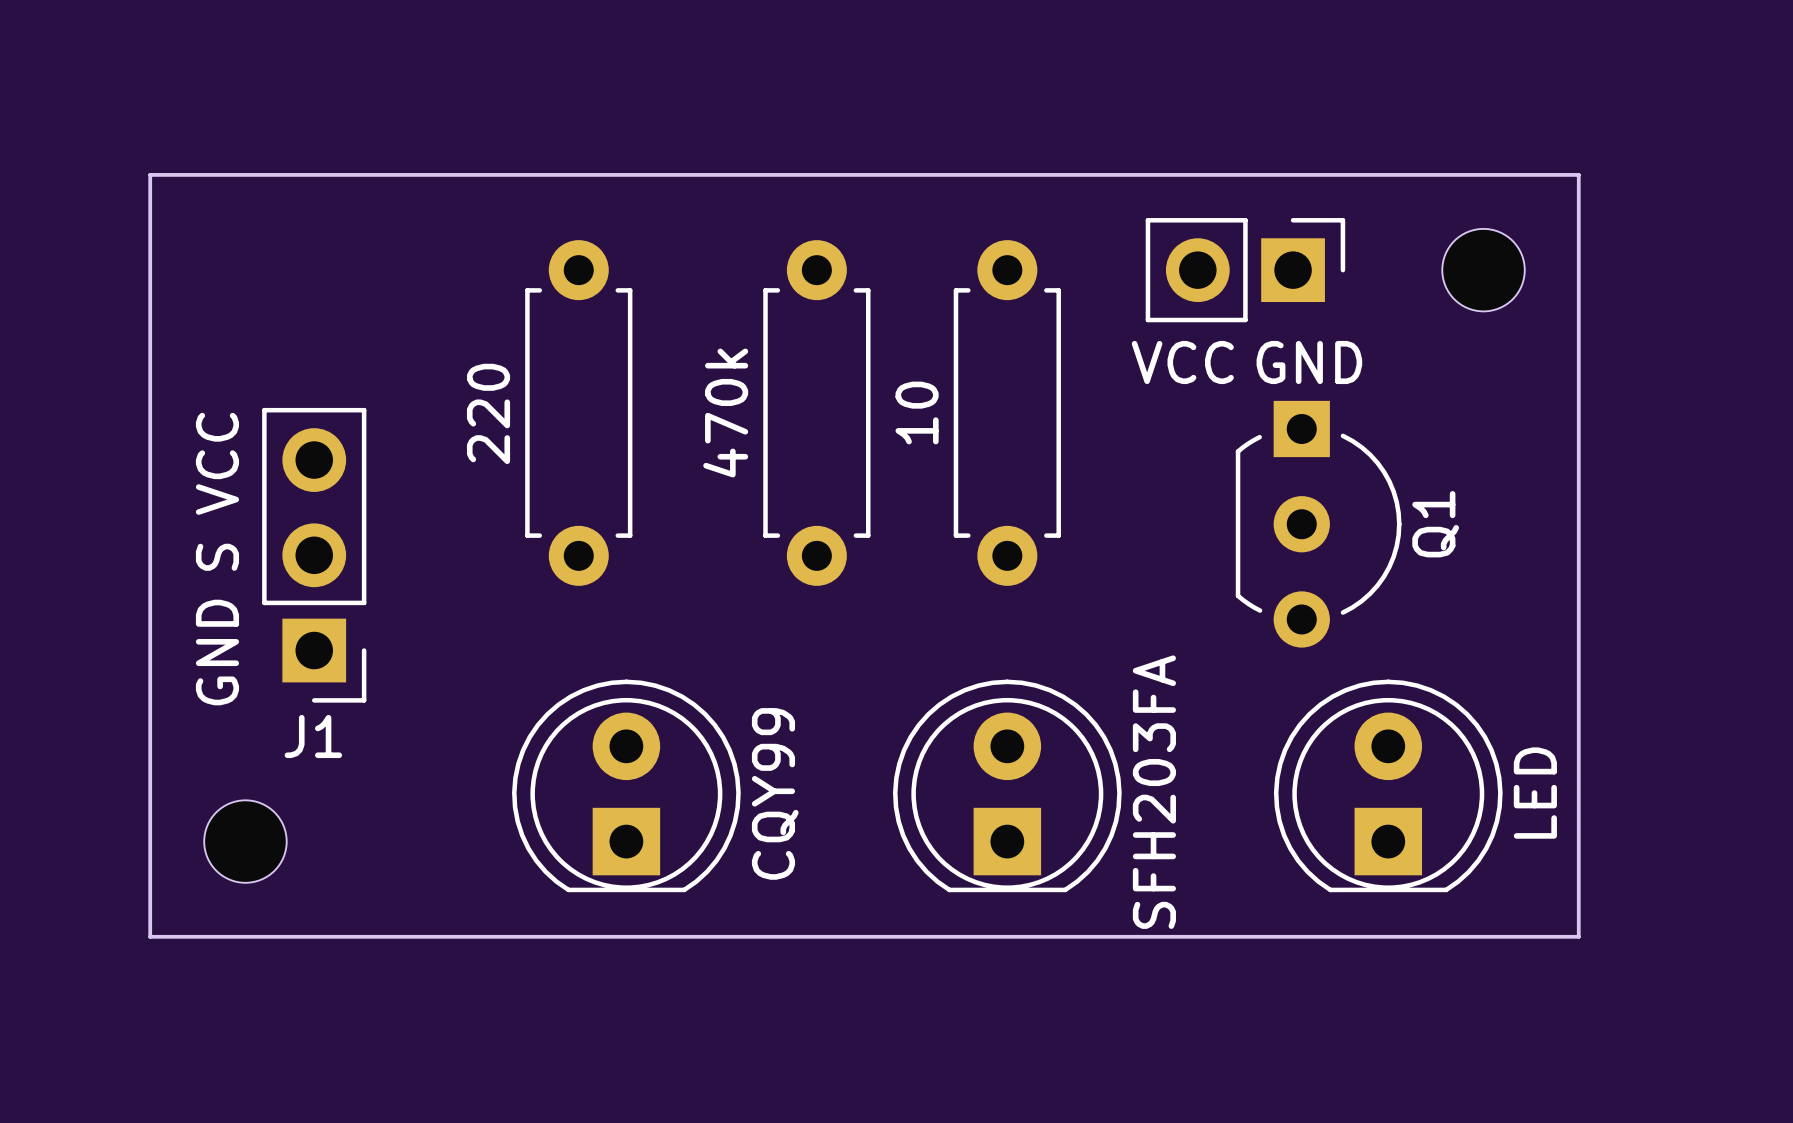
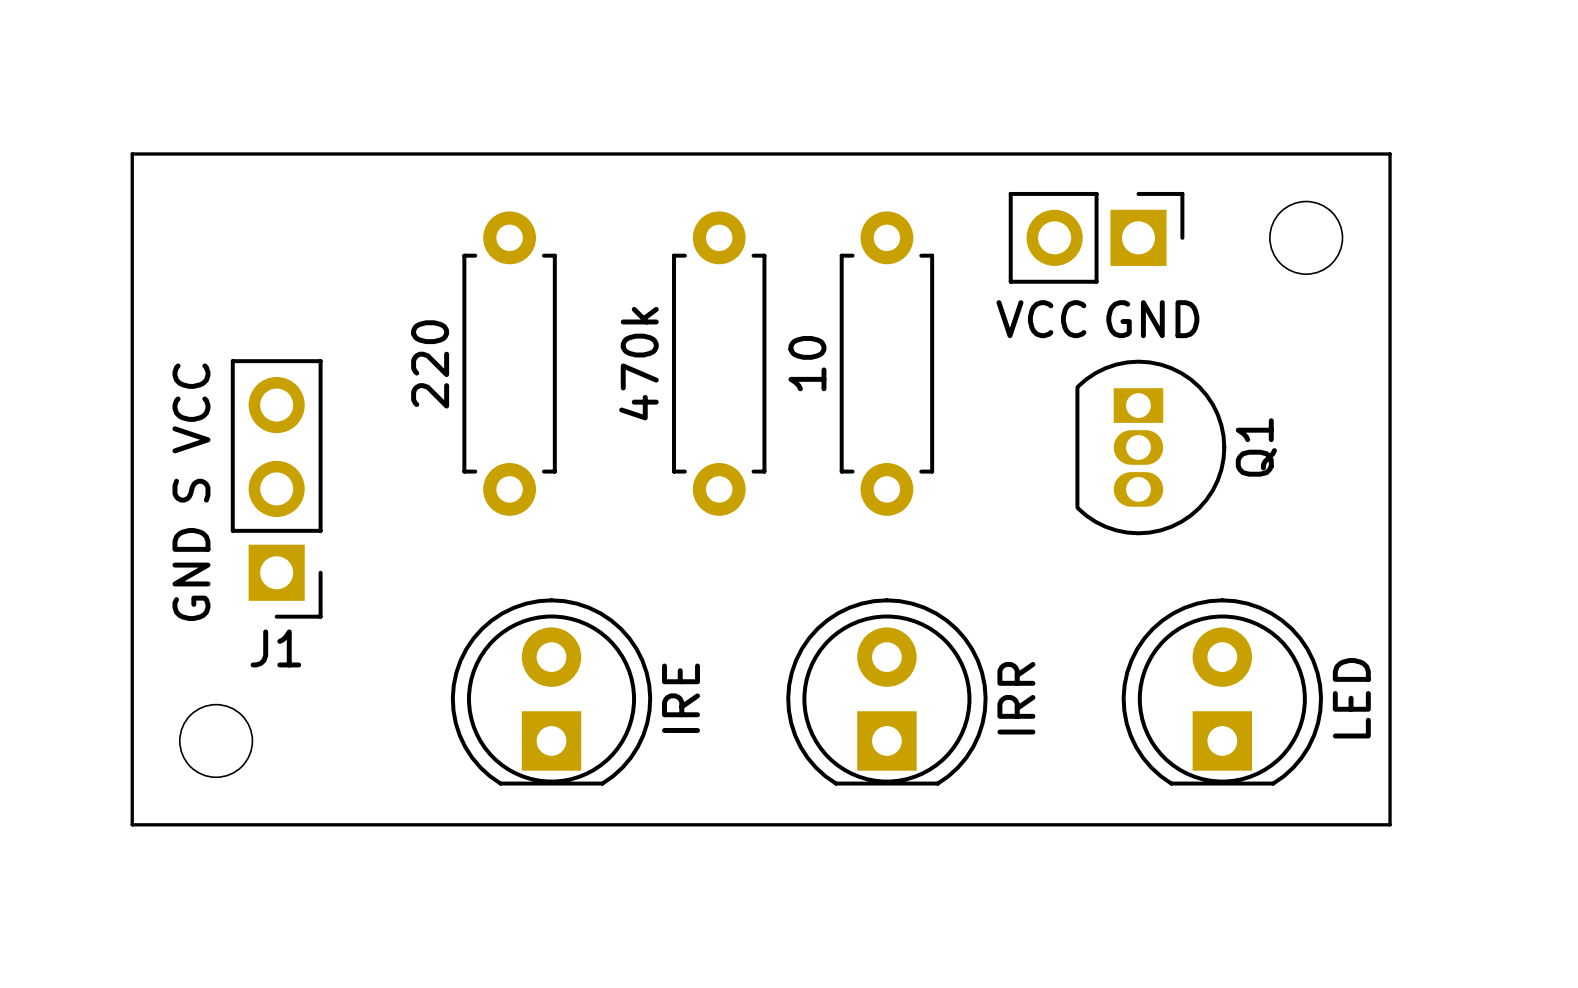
Q1 footprint: [1235, 400, 1402, 648] -> [1075, 359, 1227, 536]
part value: SFH203FA (1154, 792) -> IRR (1016, 698)
part value: CQY99 (775, 793) -> IRE (681, 698)

